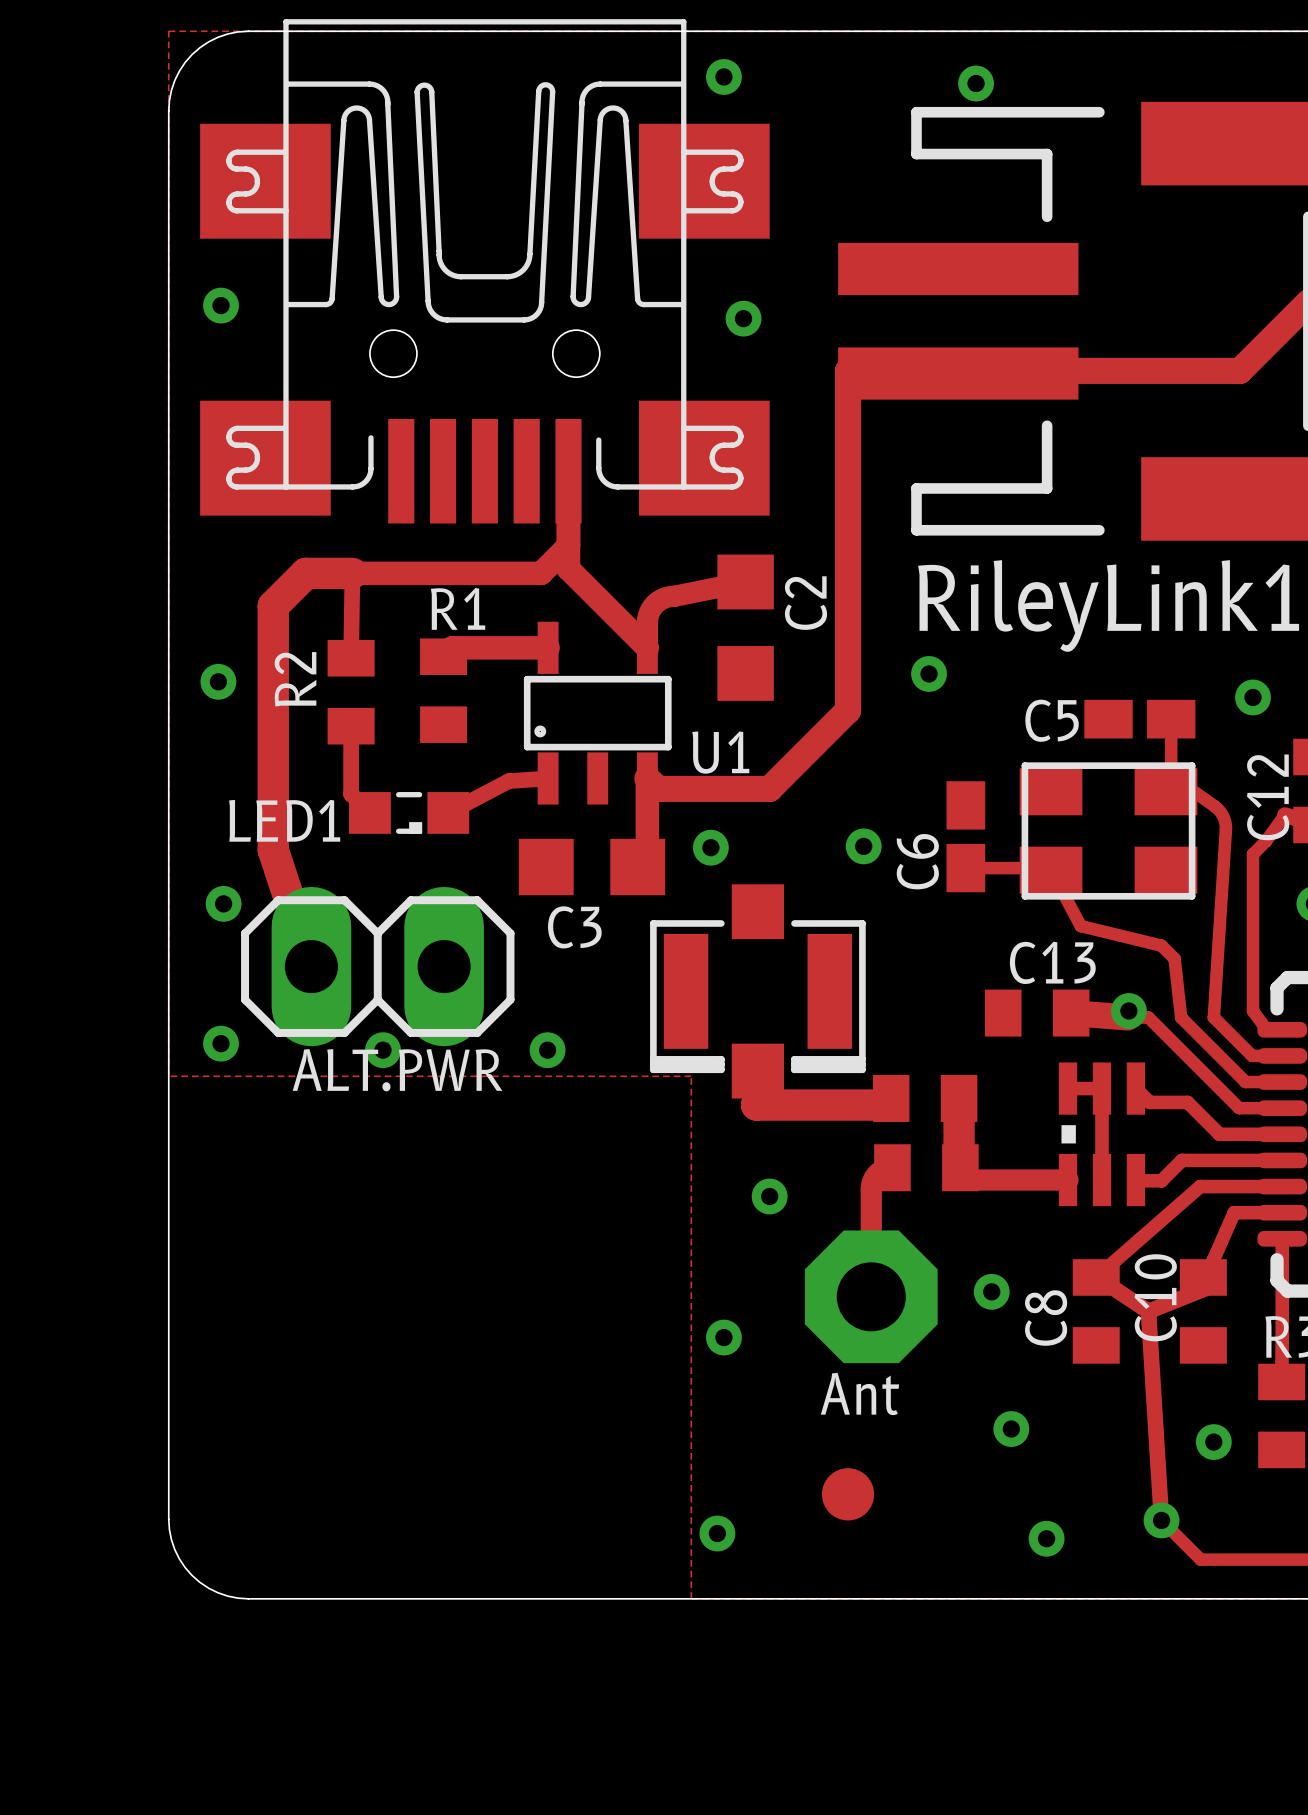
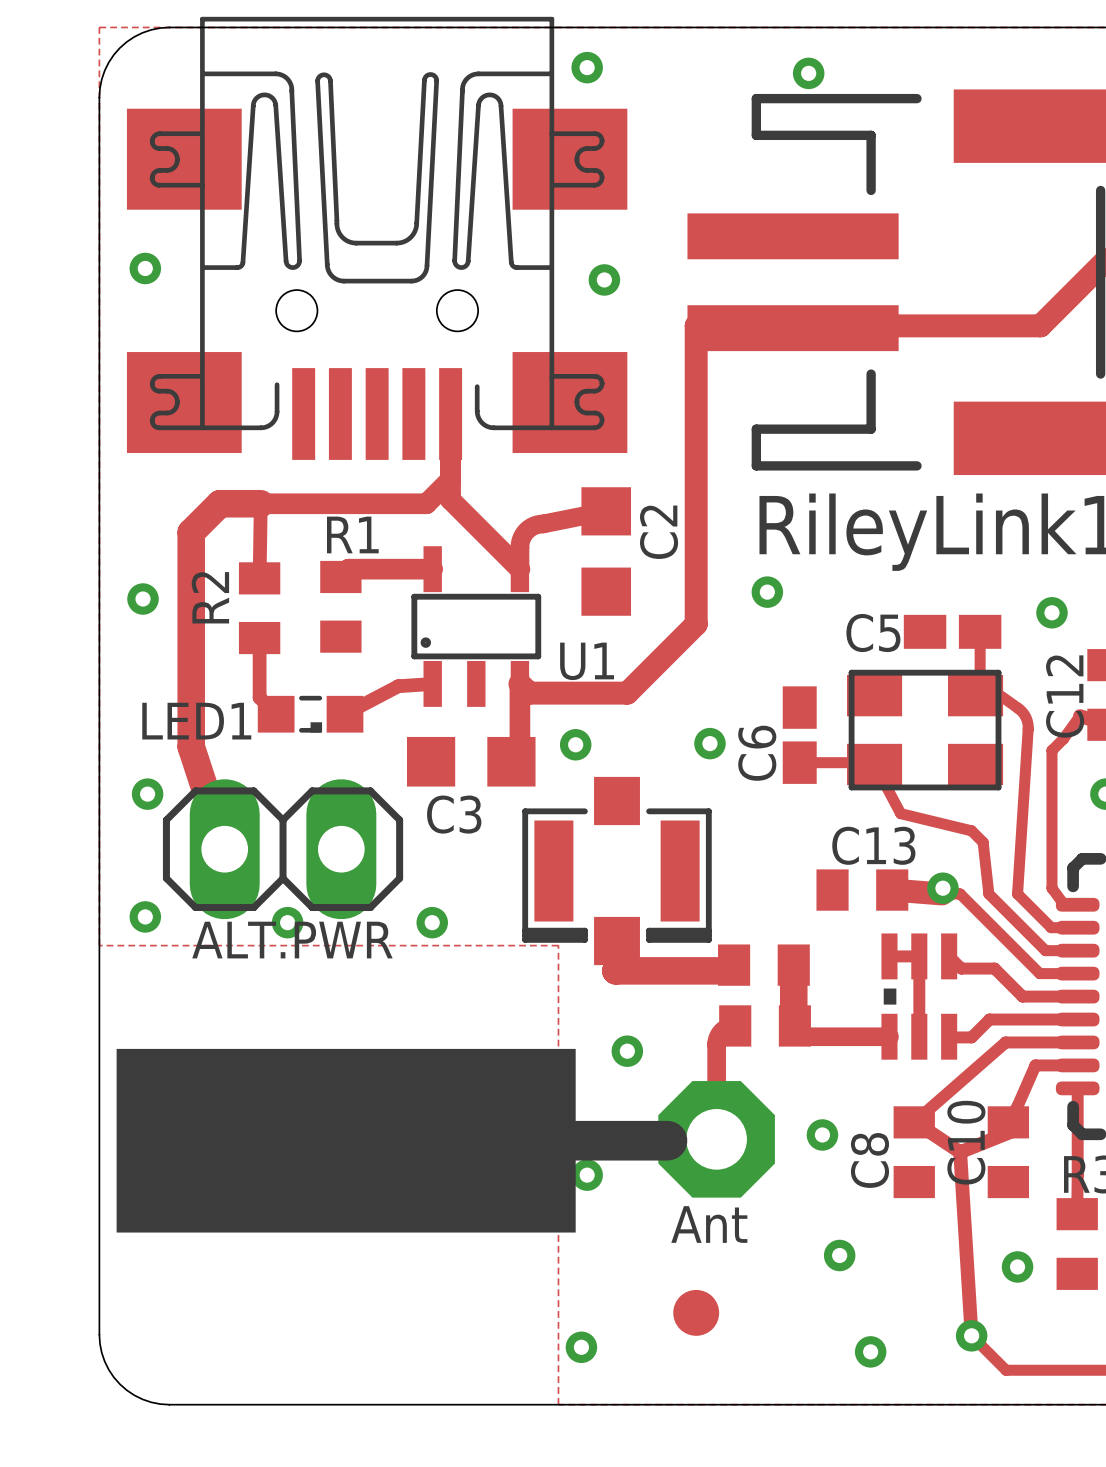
drawing: none -> [116, 1048, 576, 1233]
line: none -> (575, 1140) (667, 1140)

